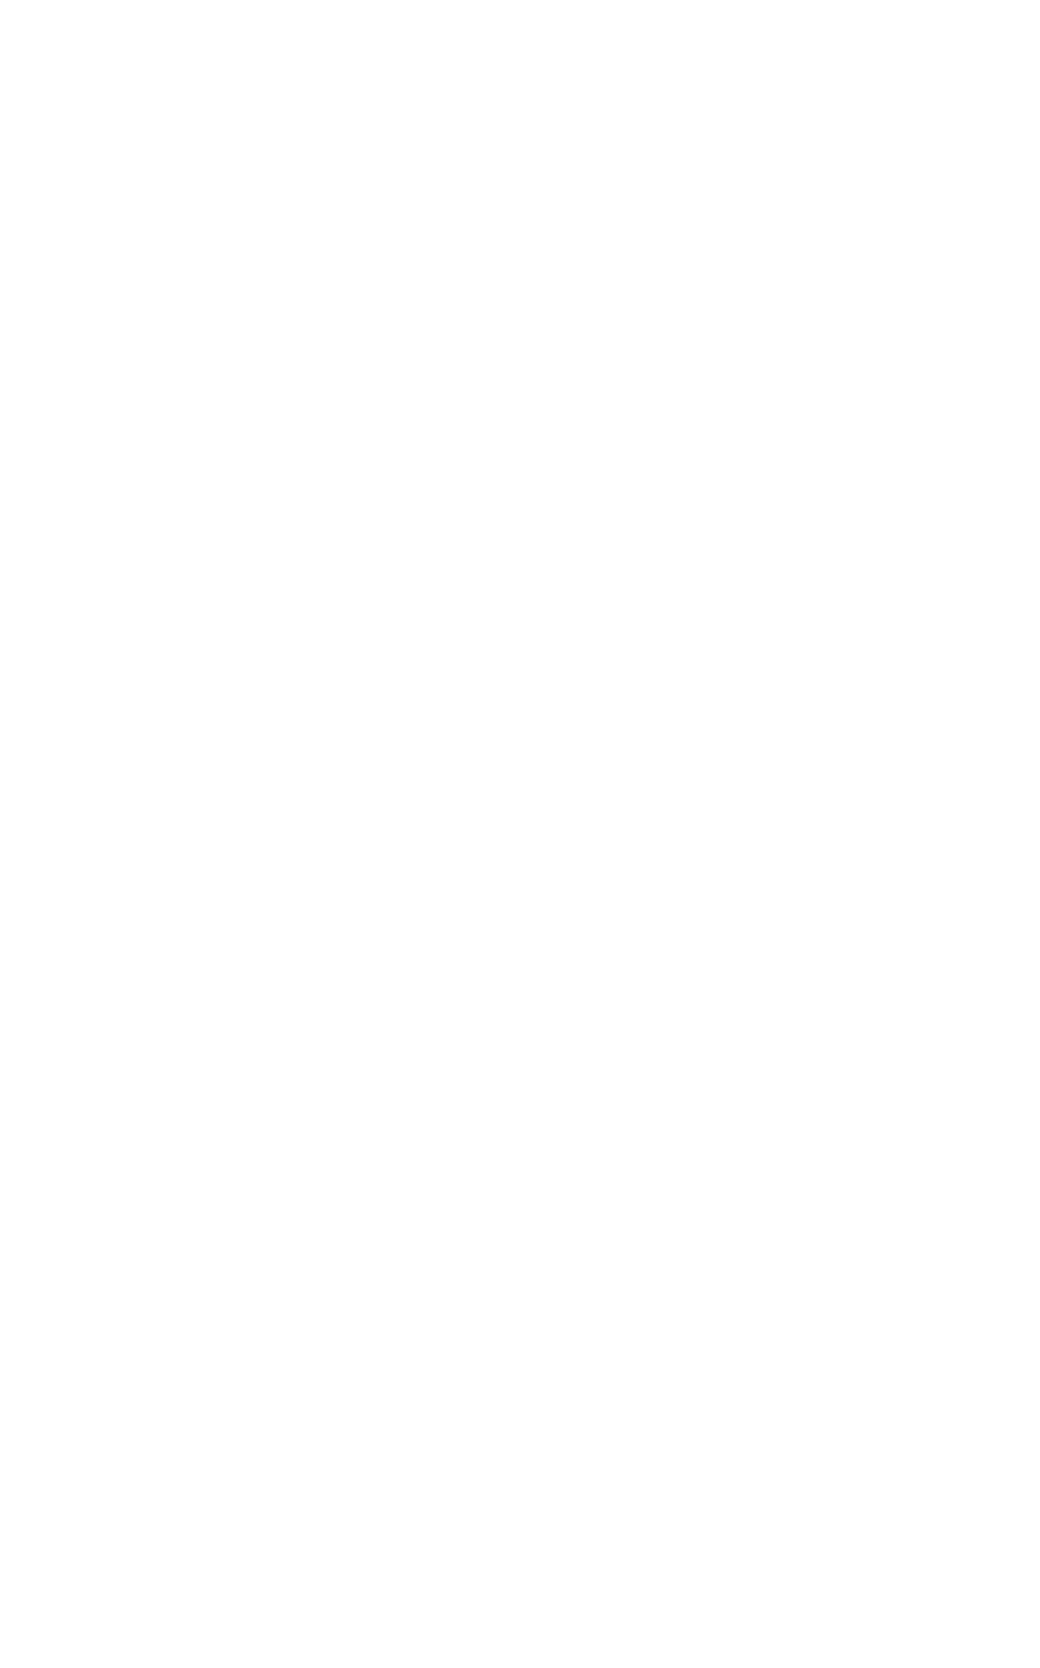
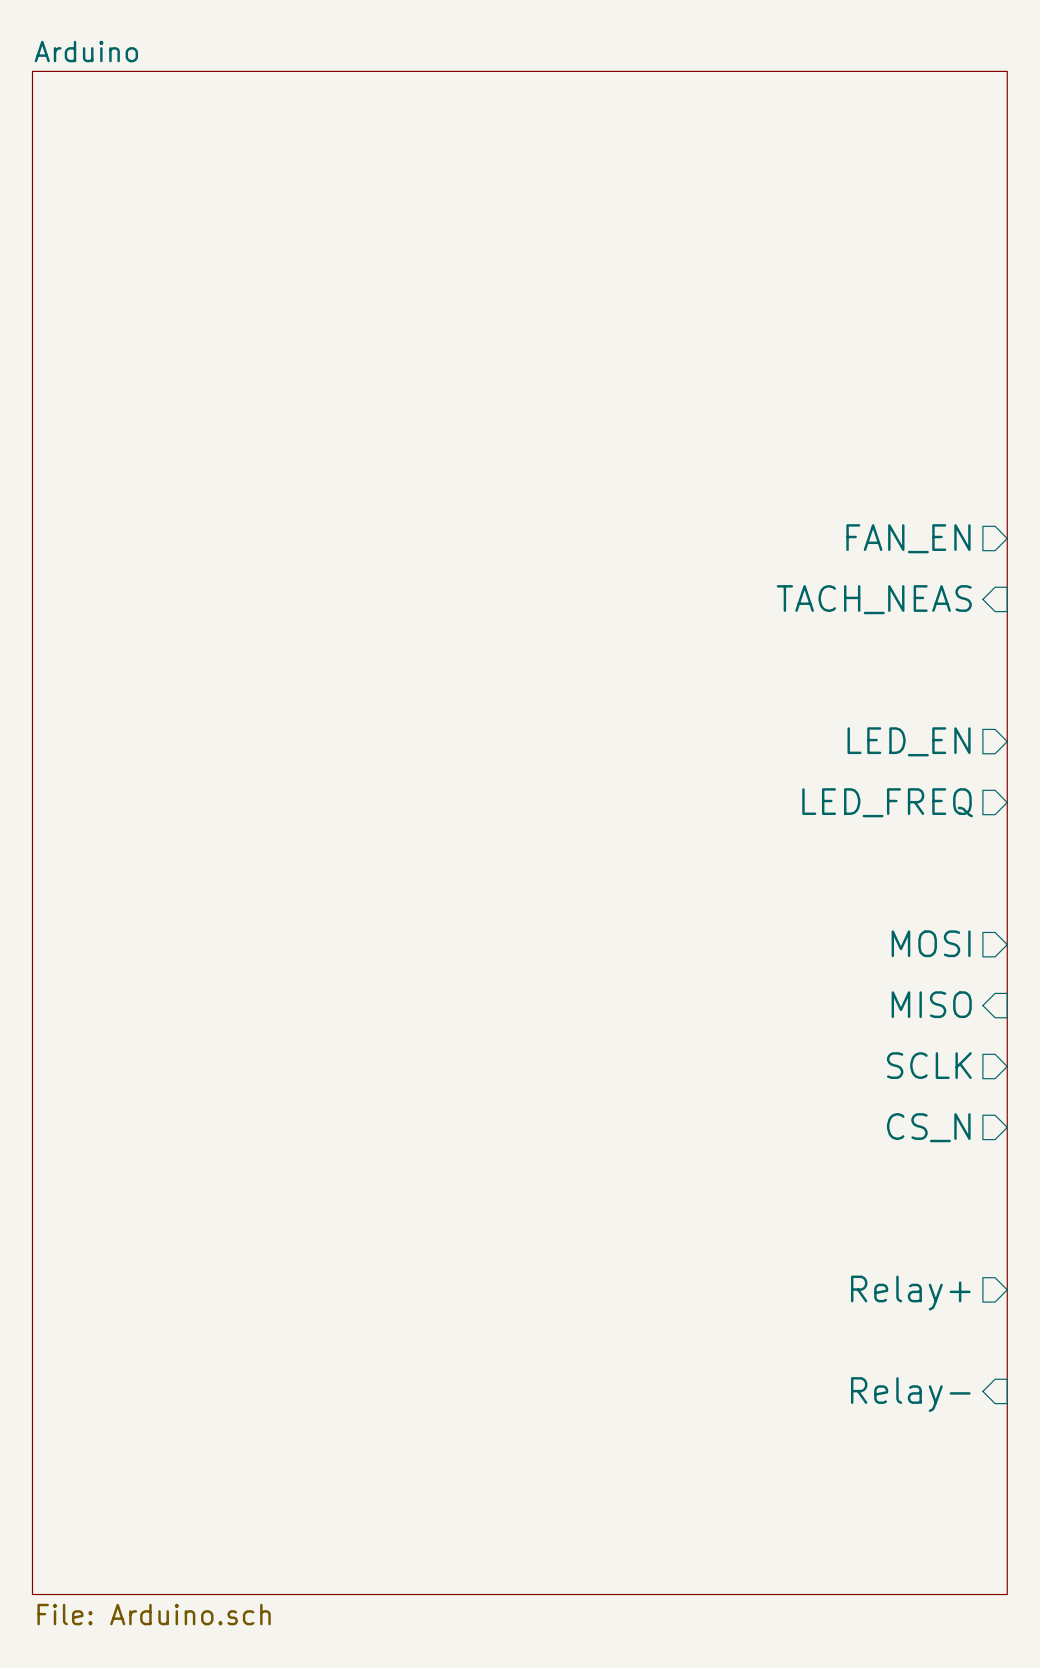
sheet pin: none -> FAN_EN (908, 538)
sheet pin: none -> TACH_NEAS (874, 599)
sheet pin: none -> LED_EN (909, 741)
sheet pin: none -> LED_FREQ (887, 802)
sheet Arduino: none -> File: Arduino.sch (519, 832)
sheet pin: none -> MOSI (931, 943)
sheet pin: none -> MISO (931, 1004)
sheet pin: none -> SCLK (929, 1065)
sheet pin: none -> CS_N (928, 1127)
sheet pin: none -> Relay+ (910, 1293)
sheet pin: none -> Relay- (910, 1394)

